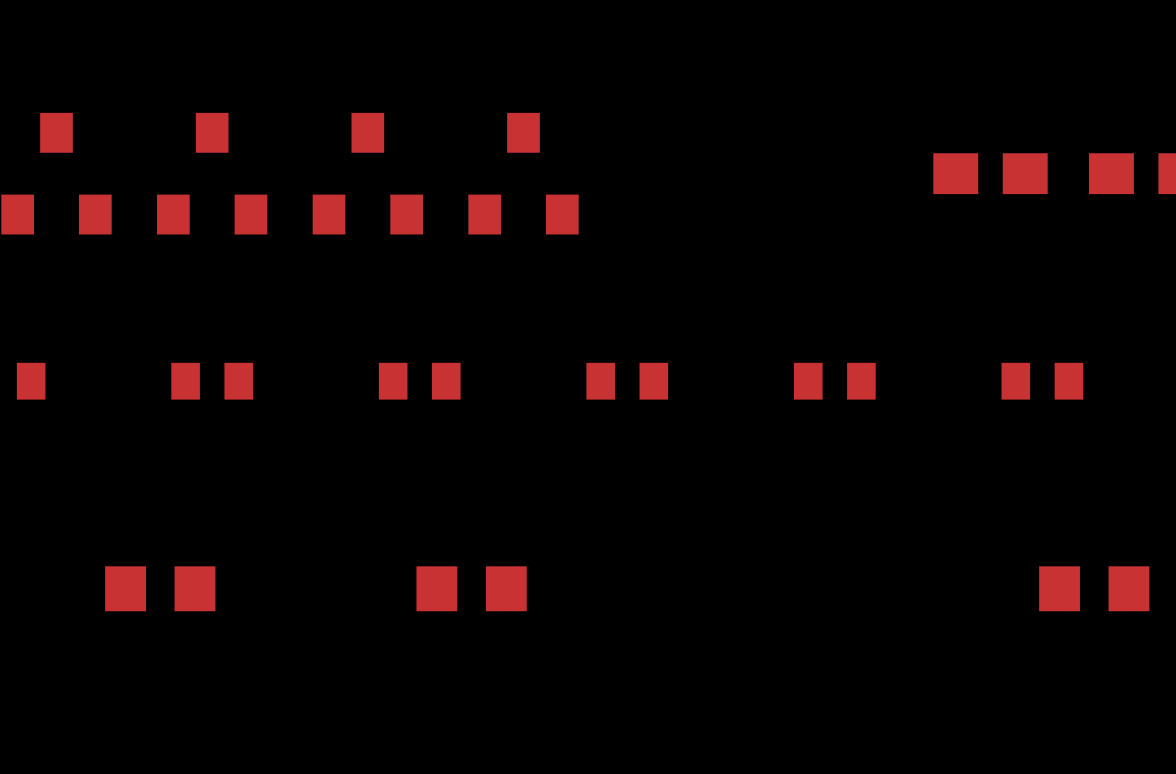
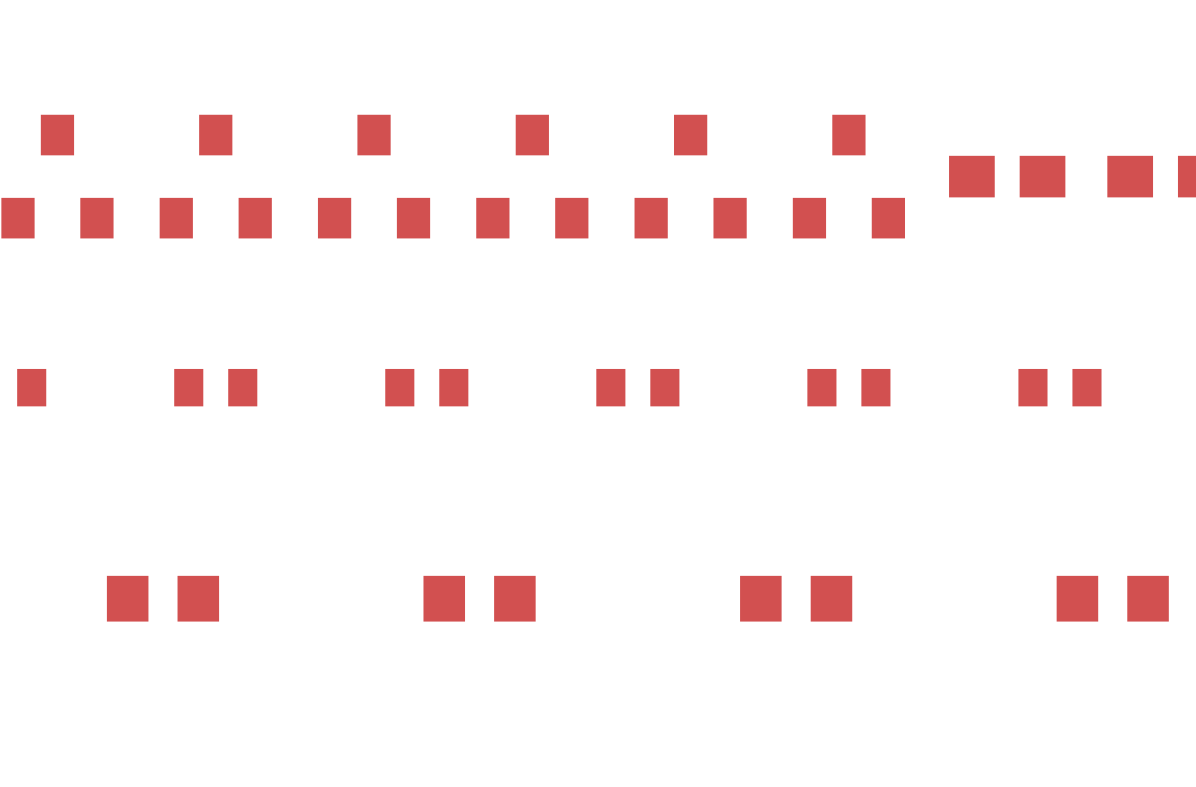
part: none -> (690, 176)
part: none -> (848, 176)
part: none -> (796, 598)

